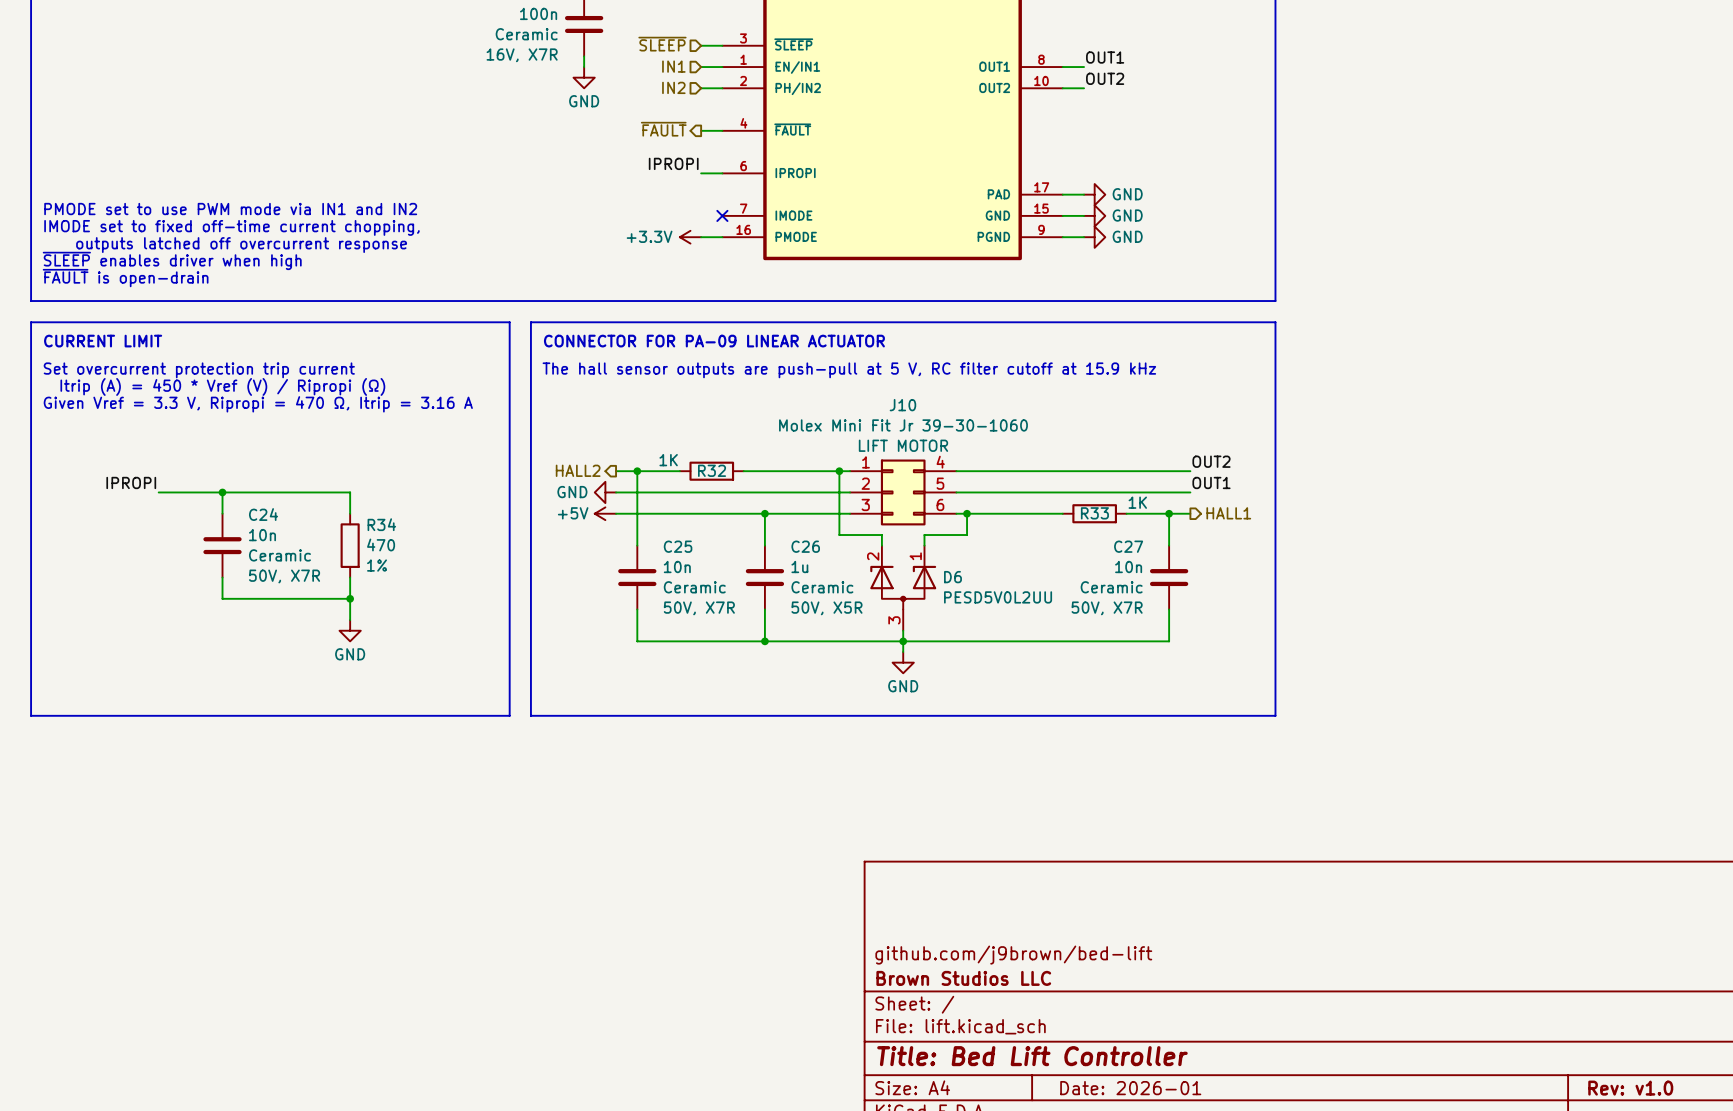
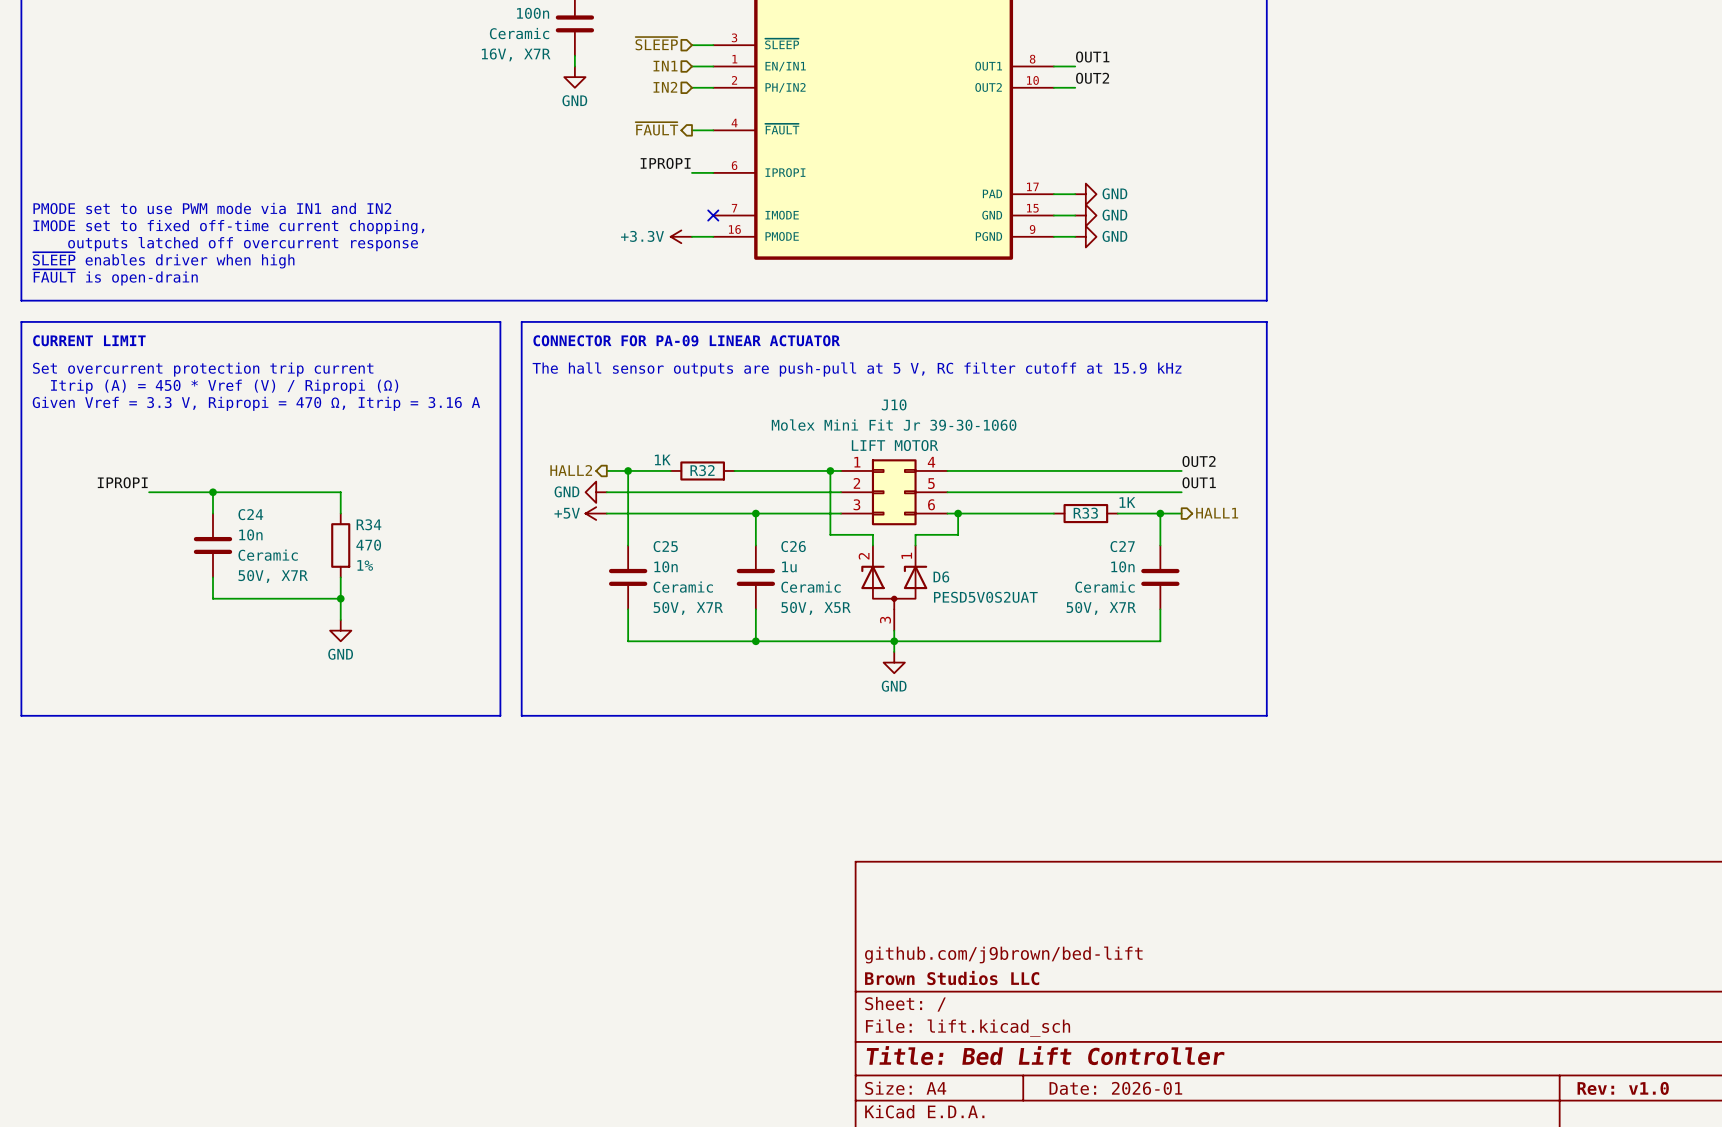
D6 value: PESD5V0L2UU (998, 597) -> PESD5V0S2UAT (985, 597)

